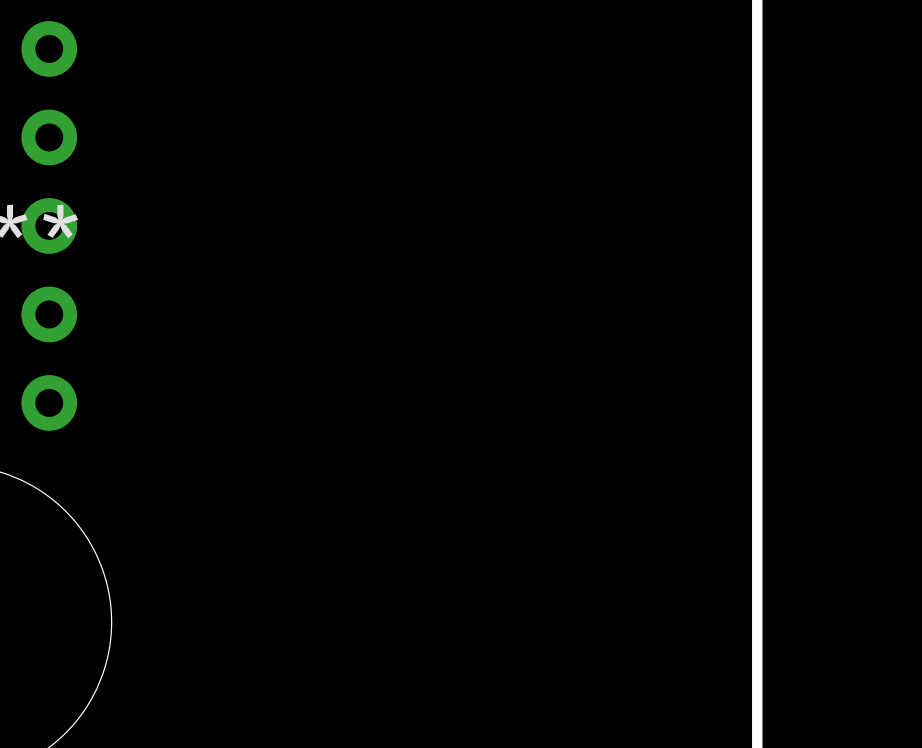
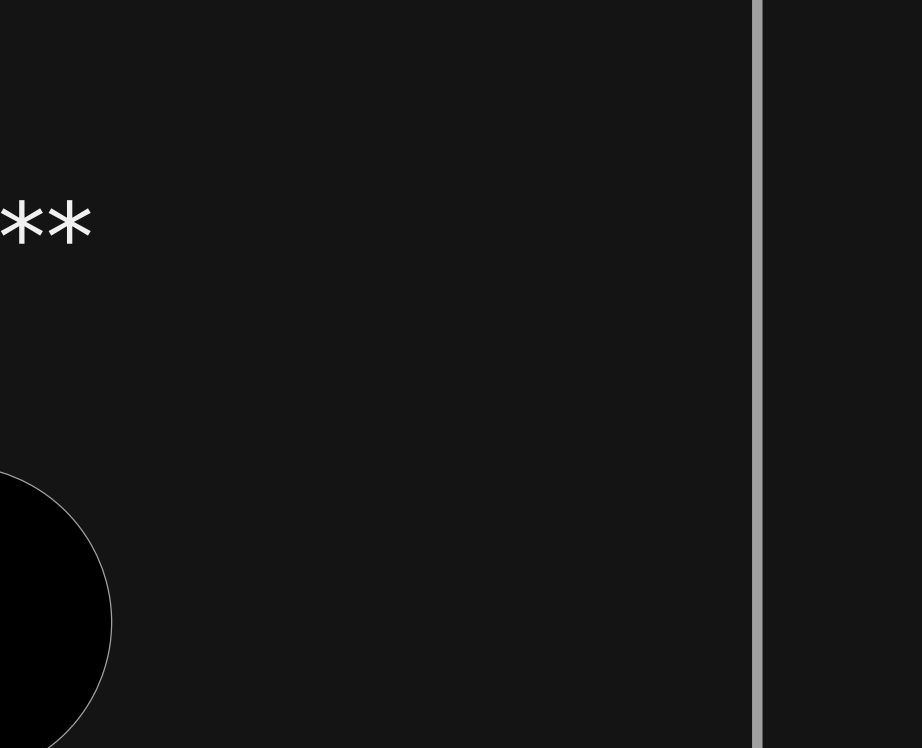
via: (49, 48) -> none
via: (49, 137) -> none
via: (49, 225) -> none
via: (49, 314) -> none
via: (49, 402) -> none

